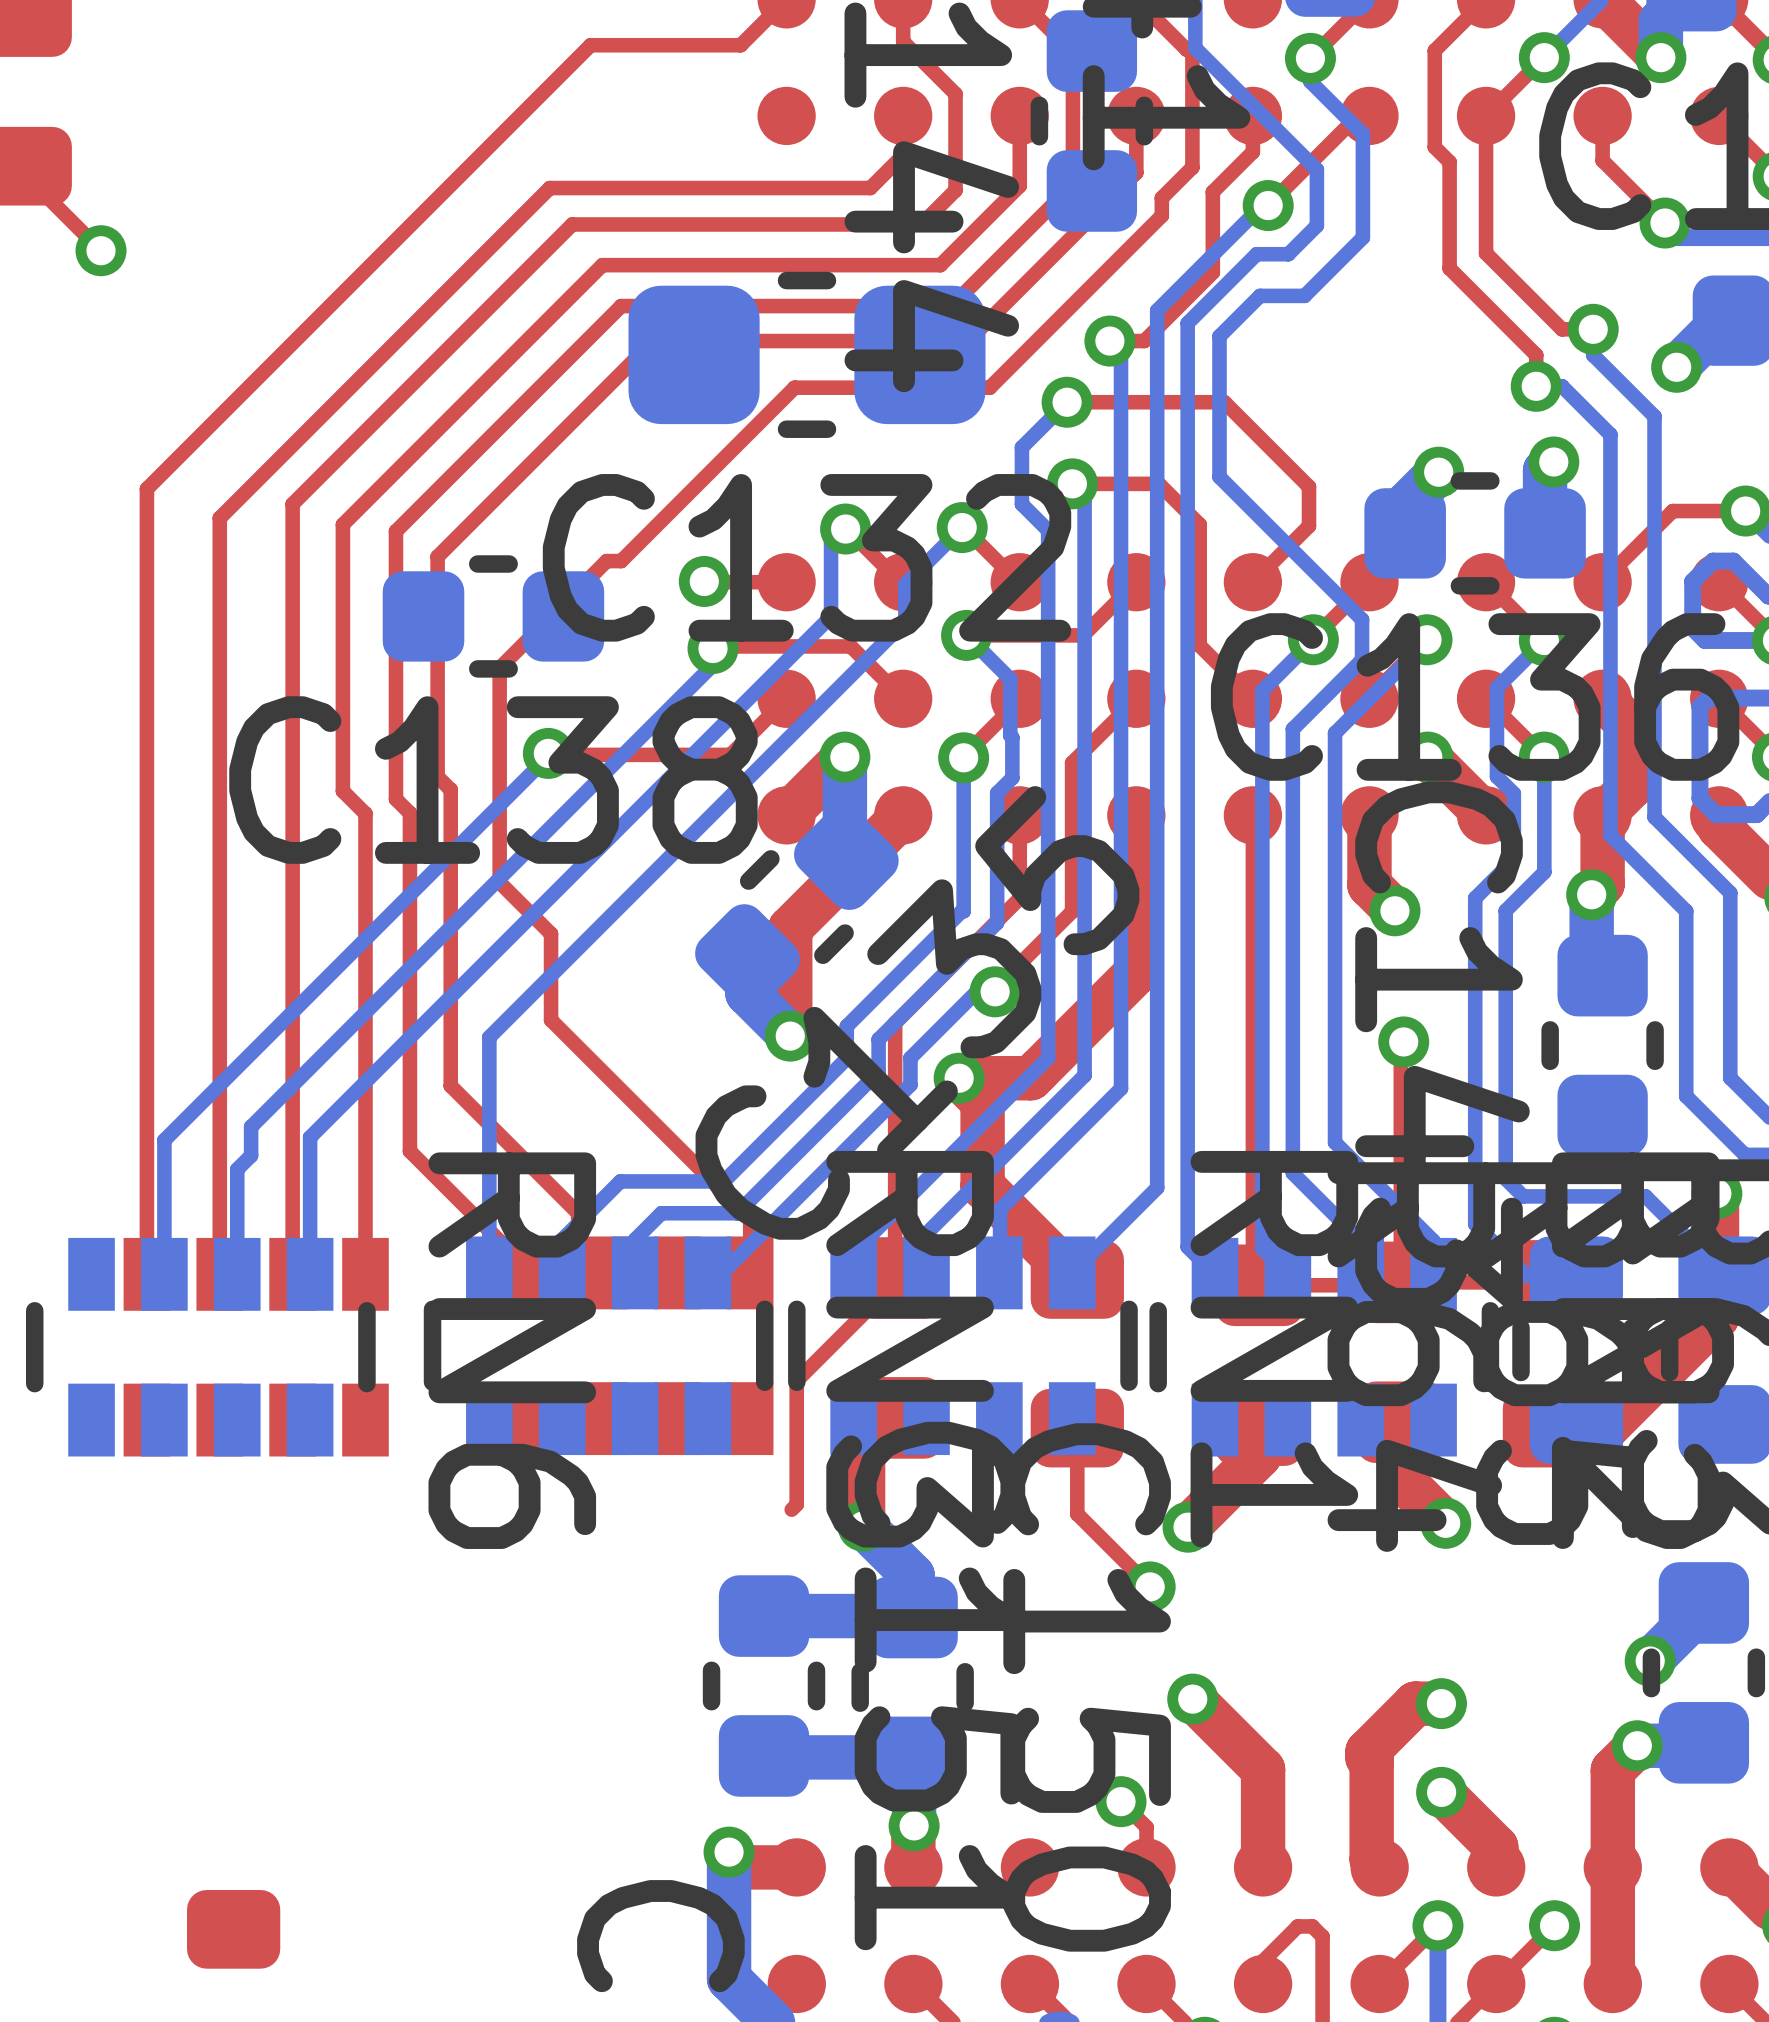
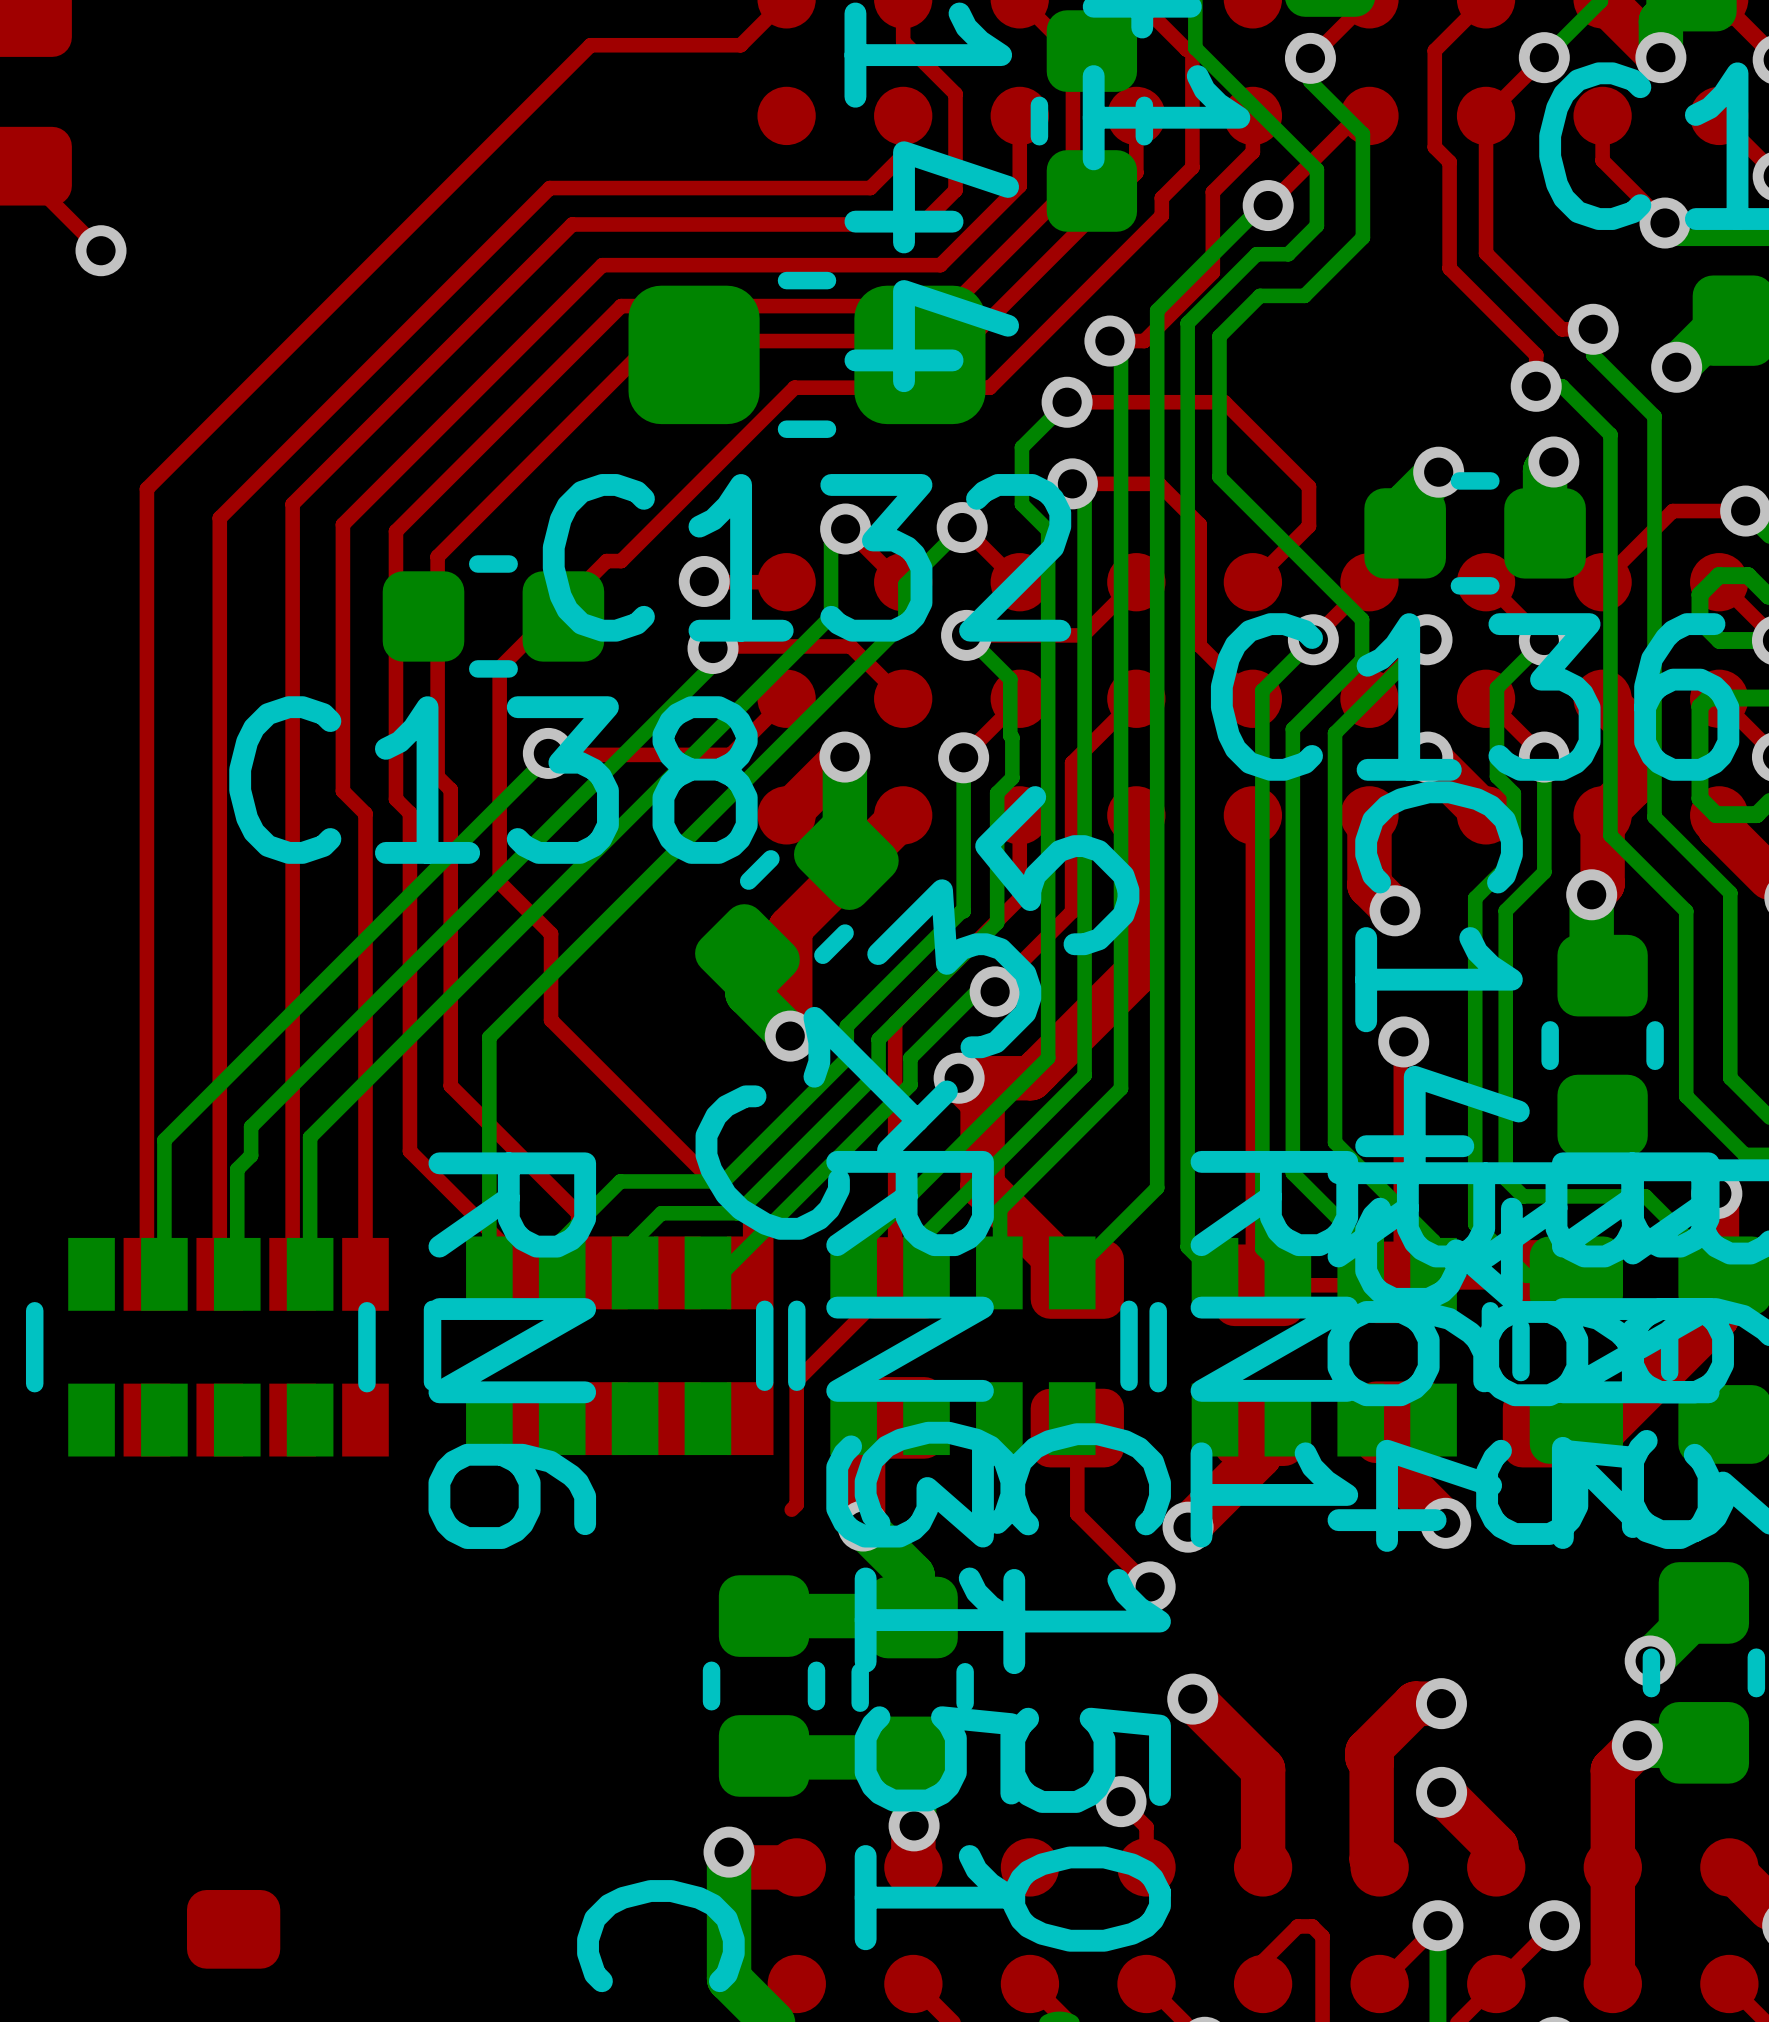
bottom track: (1748, 575) (1733, 561) (1713, 561) (1692, 581) (1692, 628) (1705, 640) (1719, 640) -> (1748, 575) (1718, 575) (1699, 594) (1699, 620) (1719, 640)

